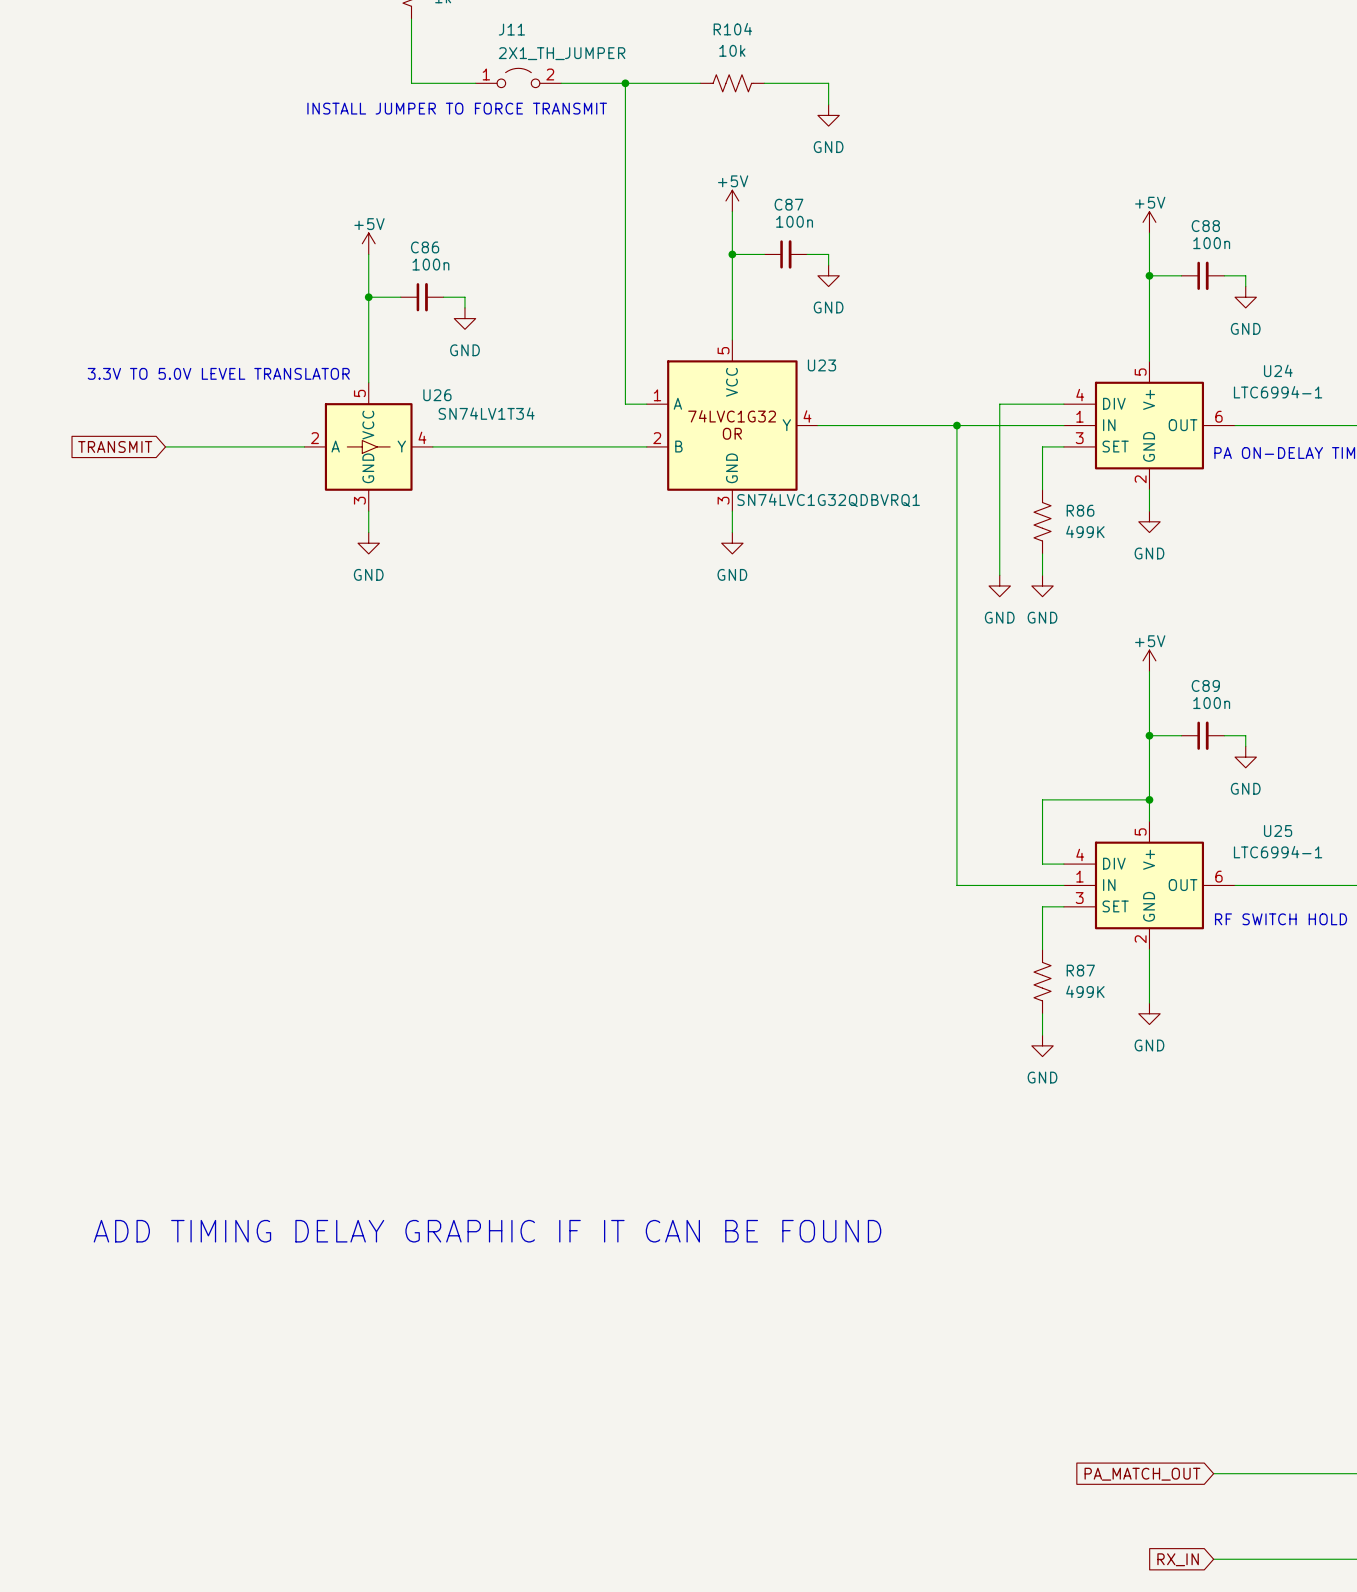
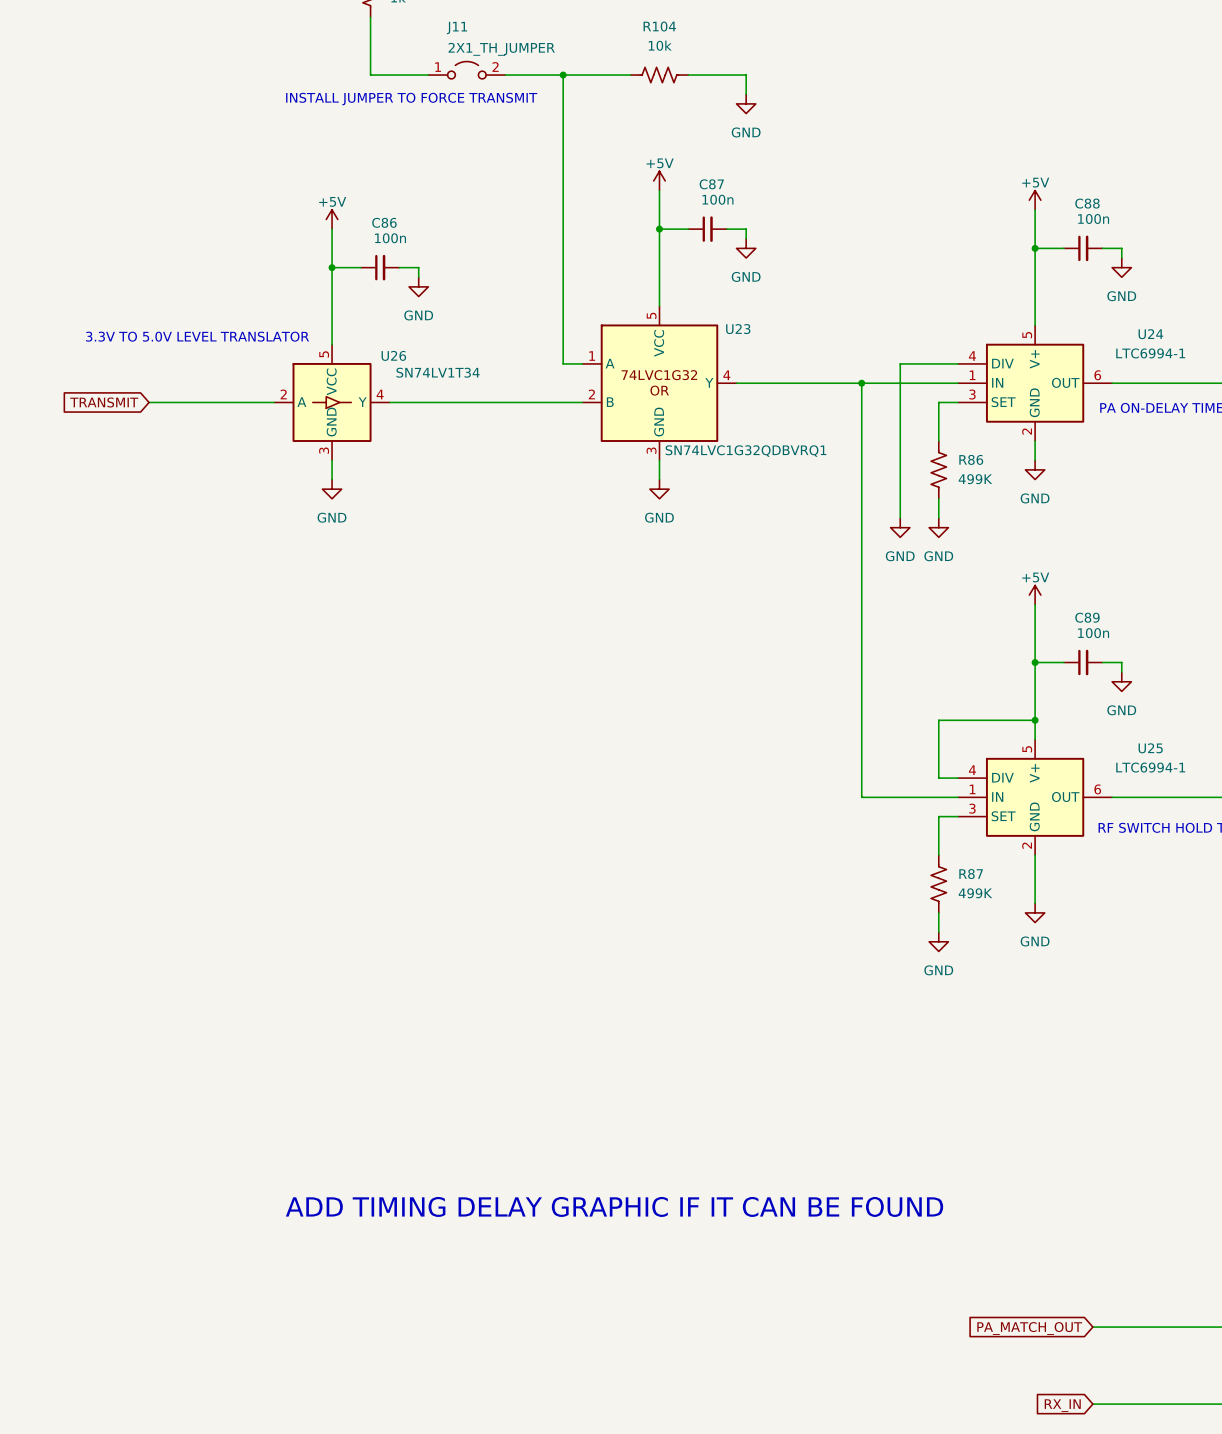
text: ADD TIMING DELAY GRAPHIC IF IT CAN BE FOUND (487, 1231) -> none
text: none -> ADD TIMING DELAY GRAPHIC IF IT CAN BE FOUND (614, 1206)

